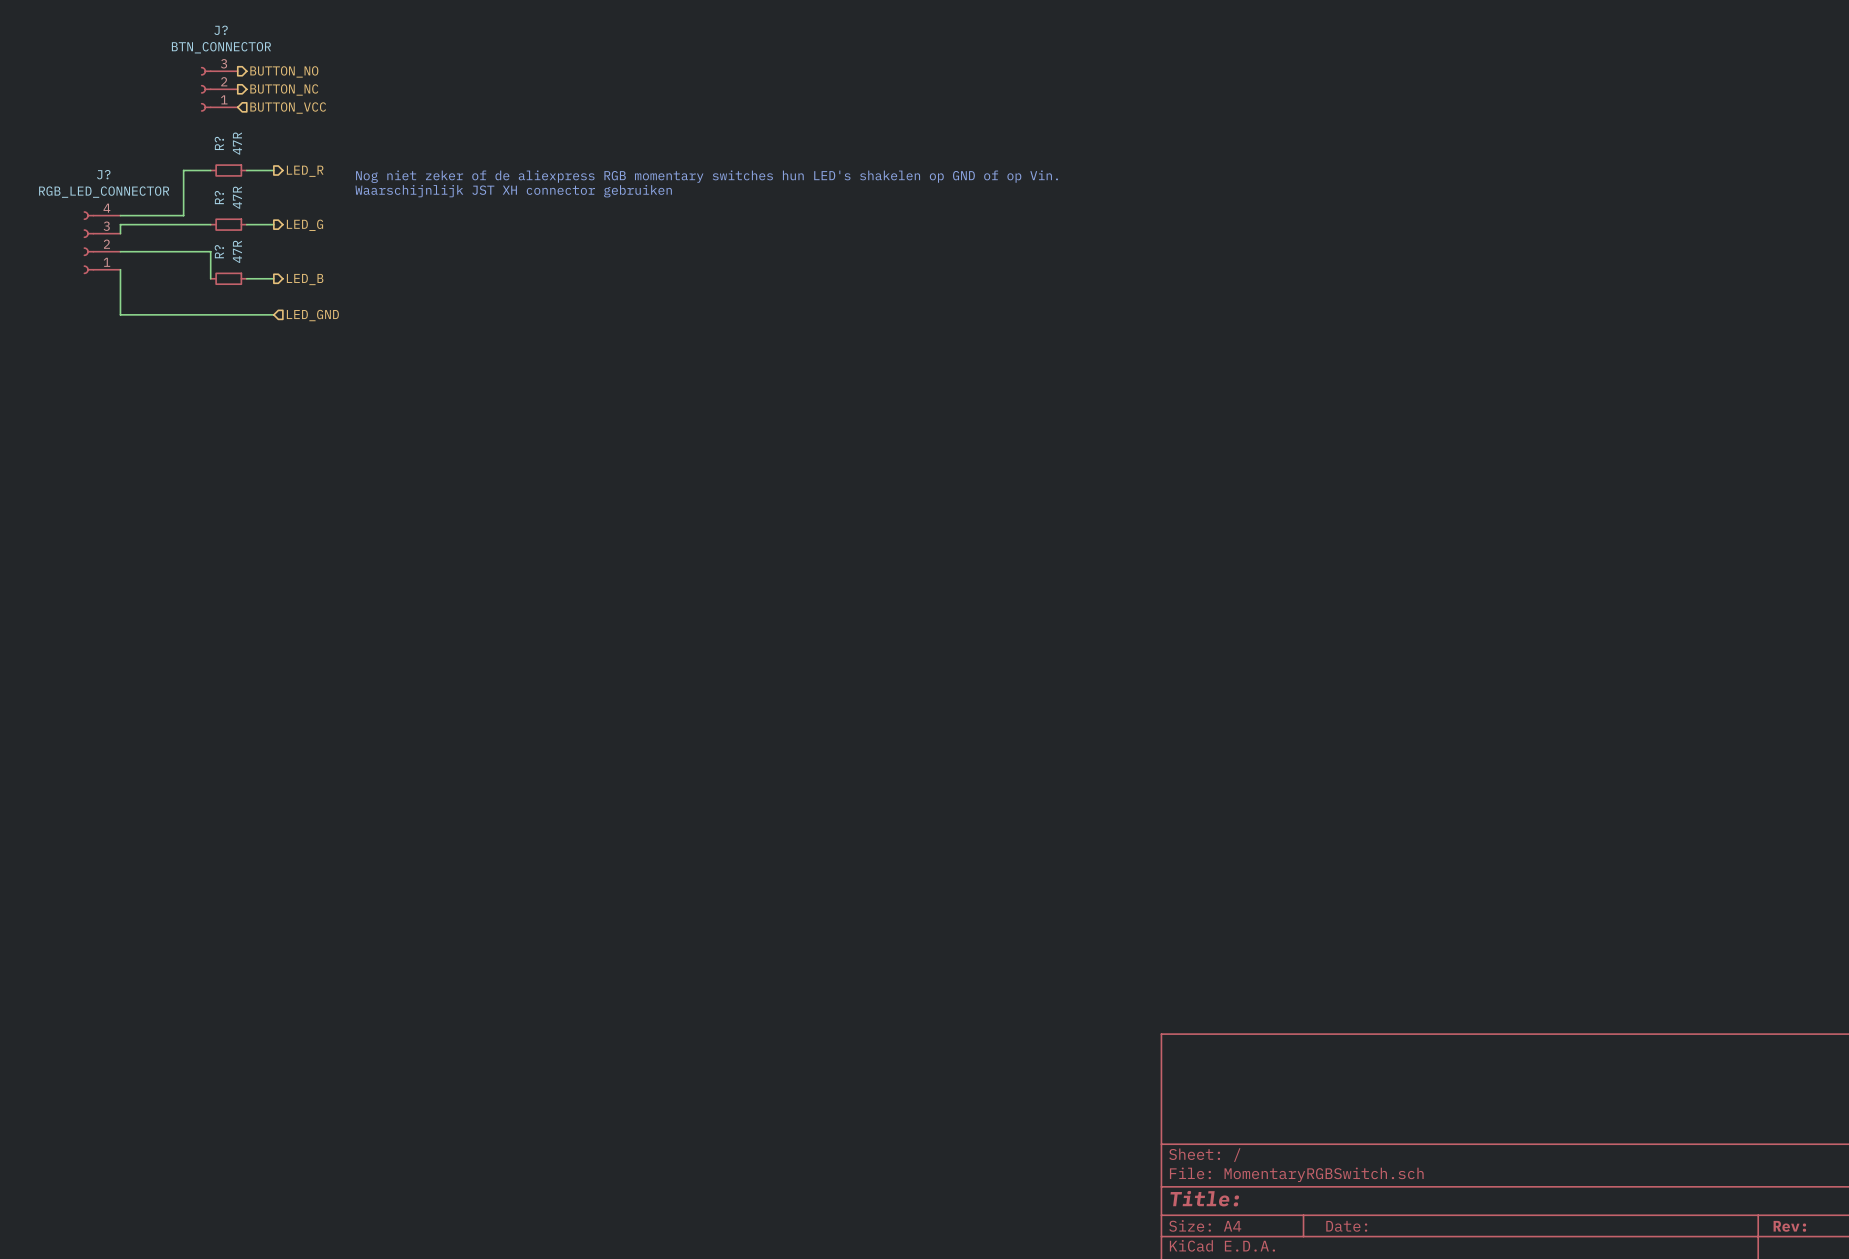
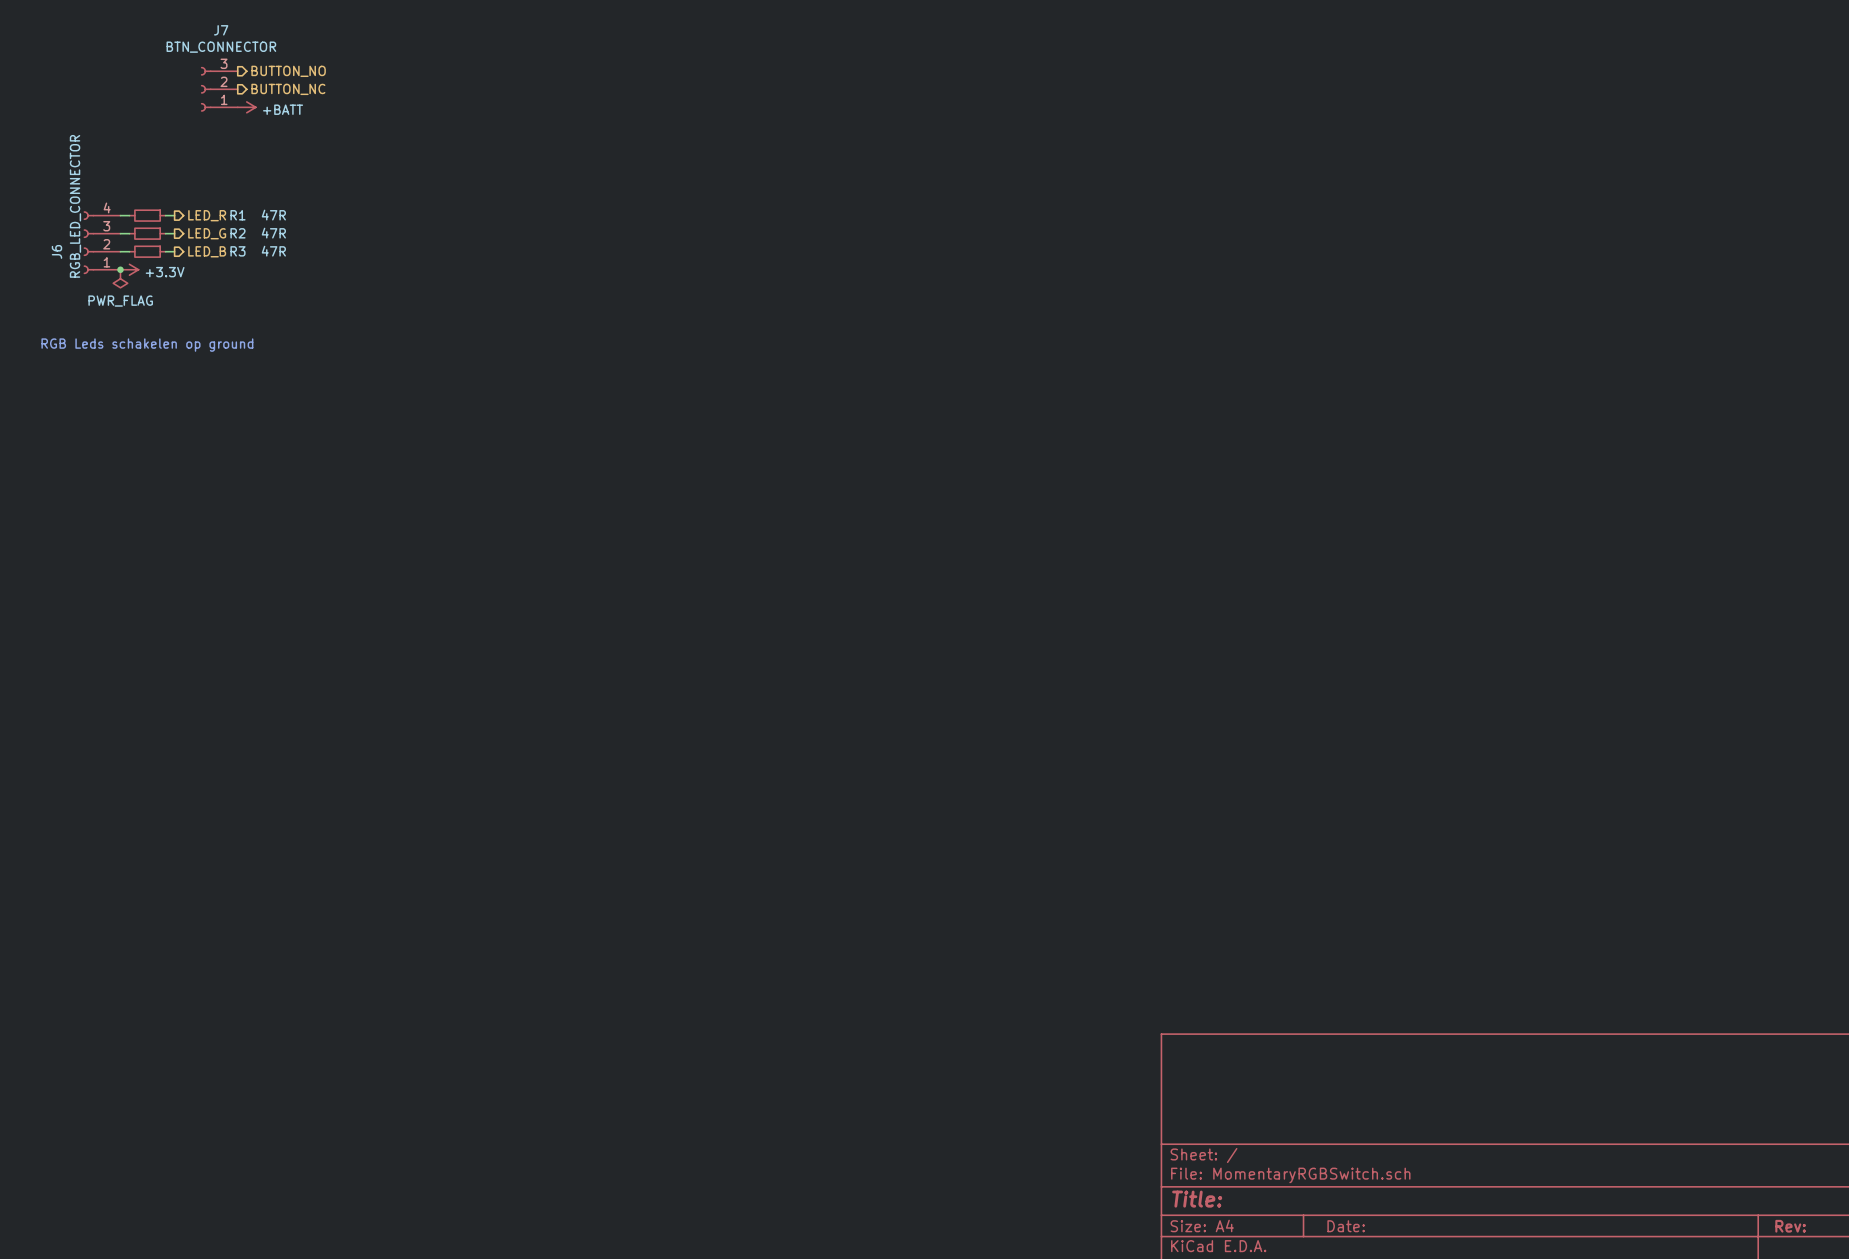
J? name: J? (221, 30) -> J7 (221, 30)
power symbol: none -> +BATT (246, 107)
hierarchical label: BUTTON_VCC (288, 108) -> none
wire: (210, 170) (183, 170) (183, 215) (174, 215) -> none
R?: 47R (228, 170) -> none
wire: (246, 170) (273, 170) -> none
hierarchical label position: LED_R (305, 171) -> LED_R (207, 215)
J? name: J? (103, 174) -> J6 (56, 251)
text: Nog niet zeker of de aliexpress RGB momentary switches hun LED's shakelen op GND of op Vin. (707, 176) -> none
text: Waarschijnlijk JST XH connector gebruiken (513, 191) -> none
J? value rotation: 0° (104, 192) -> 90° counterclockwise (75, 206)
wire: (129, 215) (165, 215) -> none
R1: none -> 47R (147, 215)
wire: (210, 224) (120, 224) (120, 233) -> (129, 233) (120, 233)
R?: 47R (228, 224) -> none
wire: (246, 224) (273, 224) -> none
hierarchical label position: LED_G (304, 225) -> LED_G (207, 233)
R2: none -> 47R (147, 233)
wire: none -> (165, 233) (174, 233)
wire: (129, 251) (165, 251) -> none
R3: none -> 47R (147, 251)
wire: (174, 251) (210, 251) (210, 278) -> none
wire: (120, 269) (120, 314) (273, 314) -> none
junction: none -> (120, 269)
power symbol: none -> +3.3V (129, 269)
power symbol: none -> PWR_FLAG (120, 278)
R?: 47R (228, 278) -> none
wire: (246, 278) (273, 278) -> none
hierarchical label position: LED_B (305, 279) -> LED_B (207, 251)
hierarchical label: LED_GND (312, 315) -> none
text: none -> RGB Leds schakelen op ground (147, 345)

